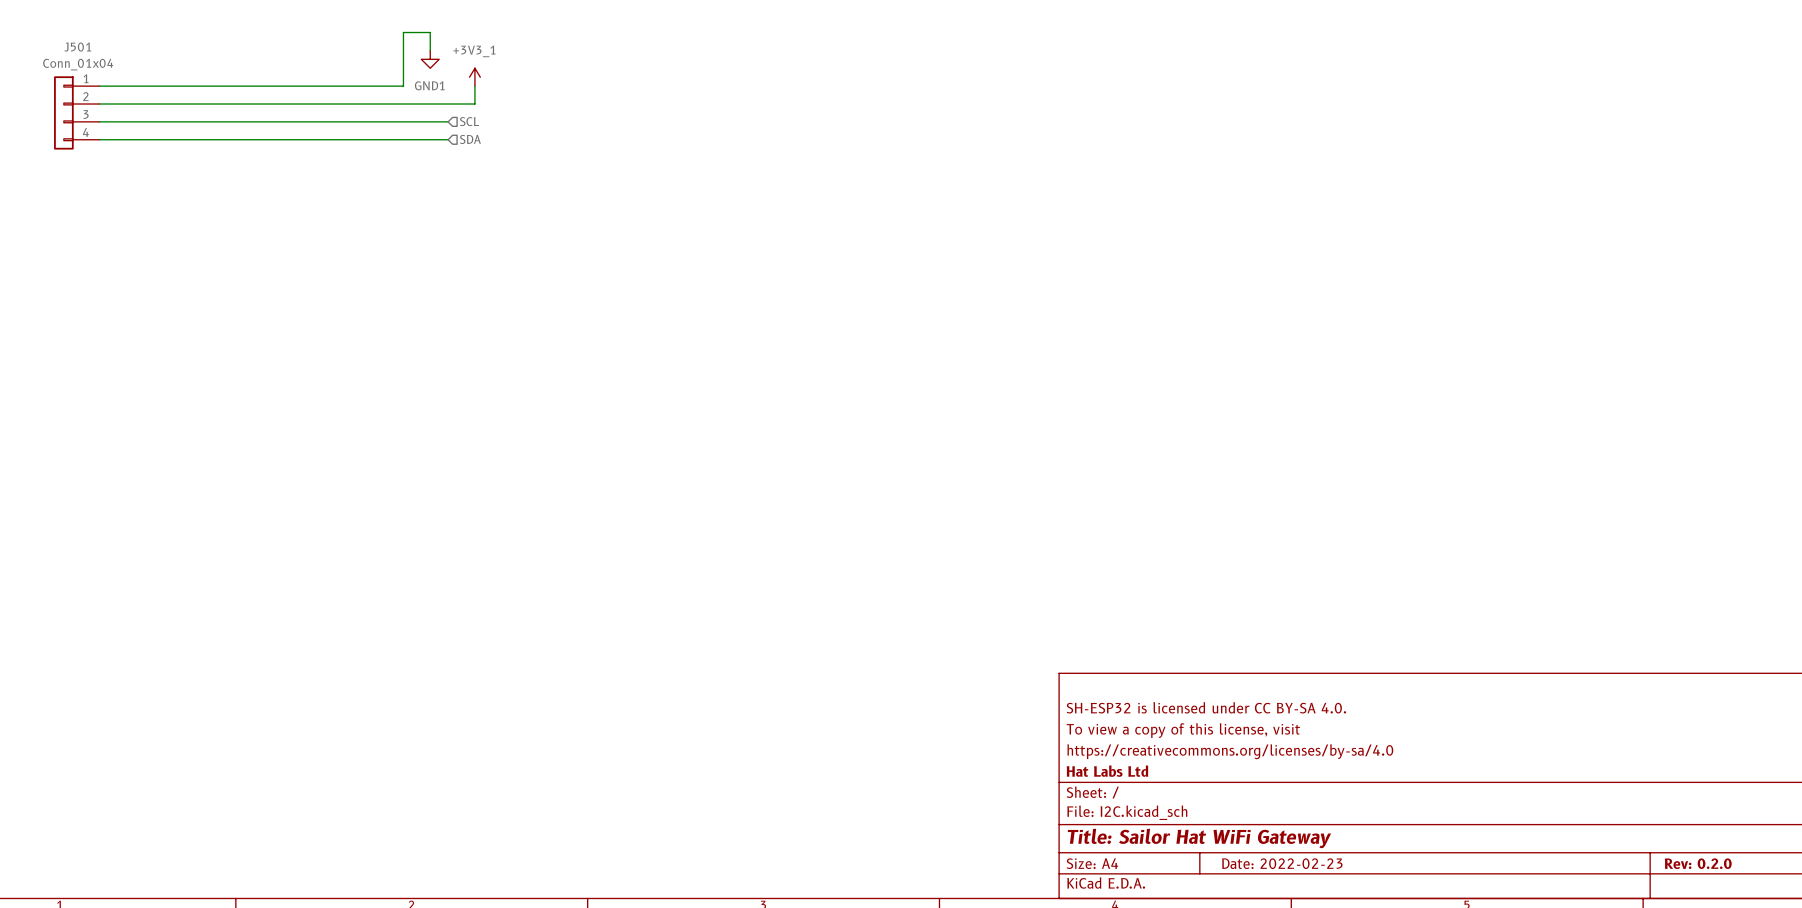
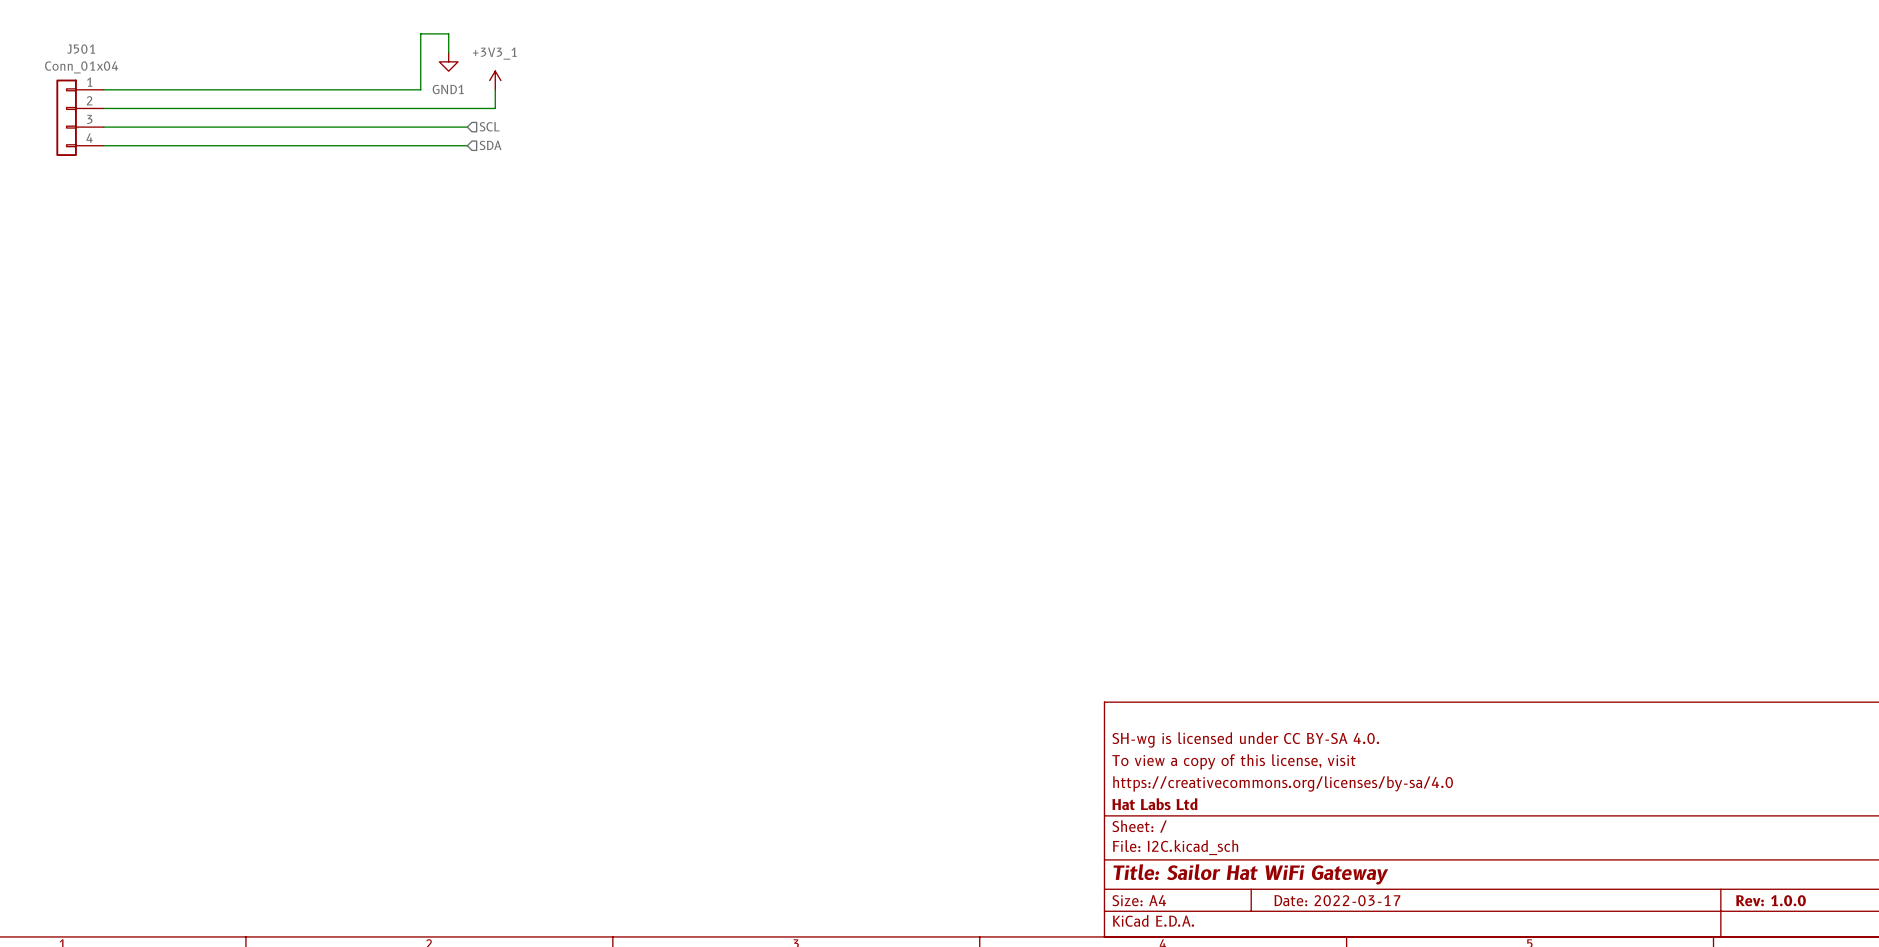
title block: SH-ESP32 is licensed under CC BY-SA 4.0. (1206, 707) -> SH-wg is licensed under CC BY-SA 4.0. (1245, 739)
title block: Date: 2022-02-23 (1282, 863) -> Date: 2022-03-17 (1337, 900)
title block: Rev: 0.2.0 (1698, 863) -> Rev: 1.0.0 (1770, 900)

